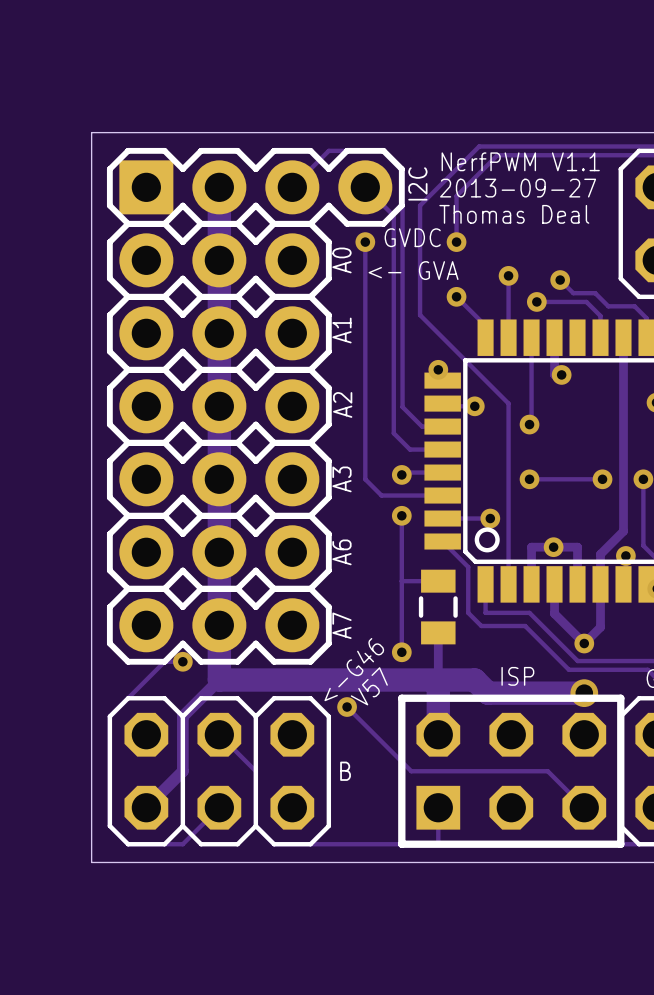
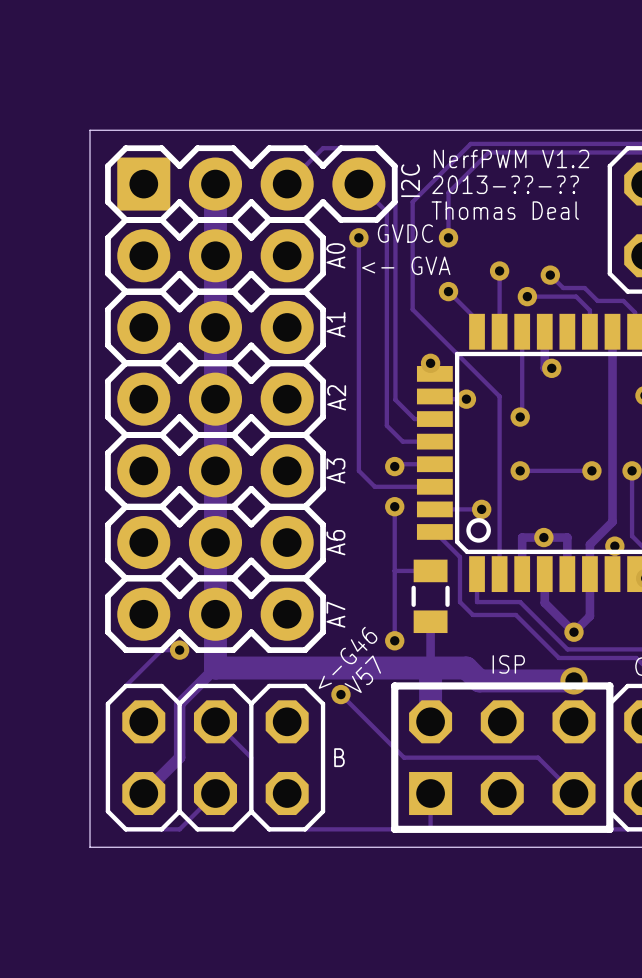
text: NerfPWM V1.1 (520, 161) -> NerfPWM V1.2 (511, 158)
text: 2013-09-27 (518, 188) -> 2013-??-?? (505, 184)

